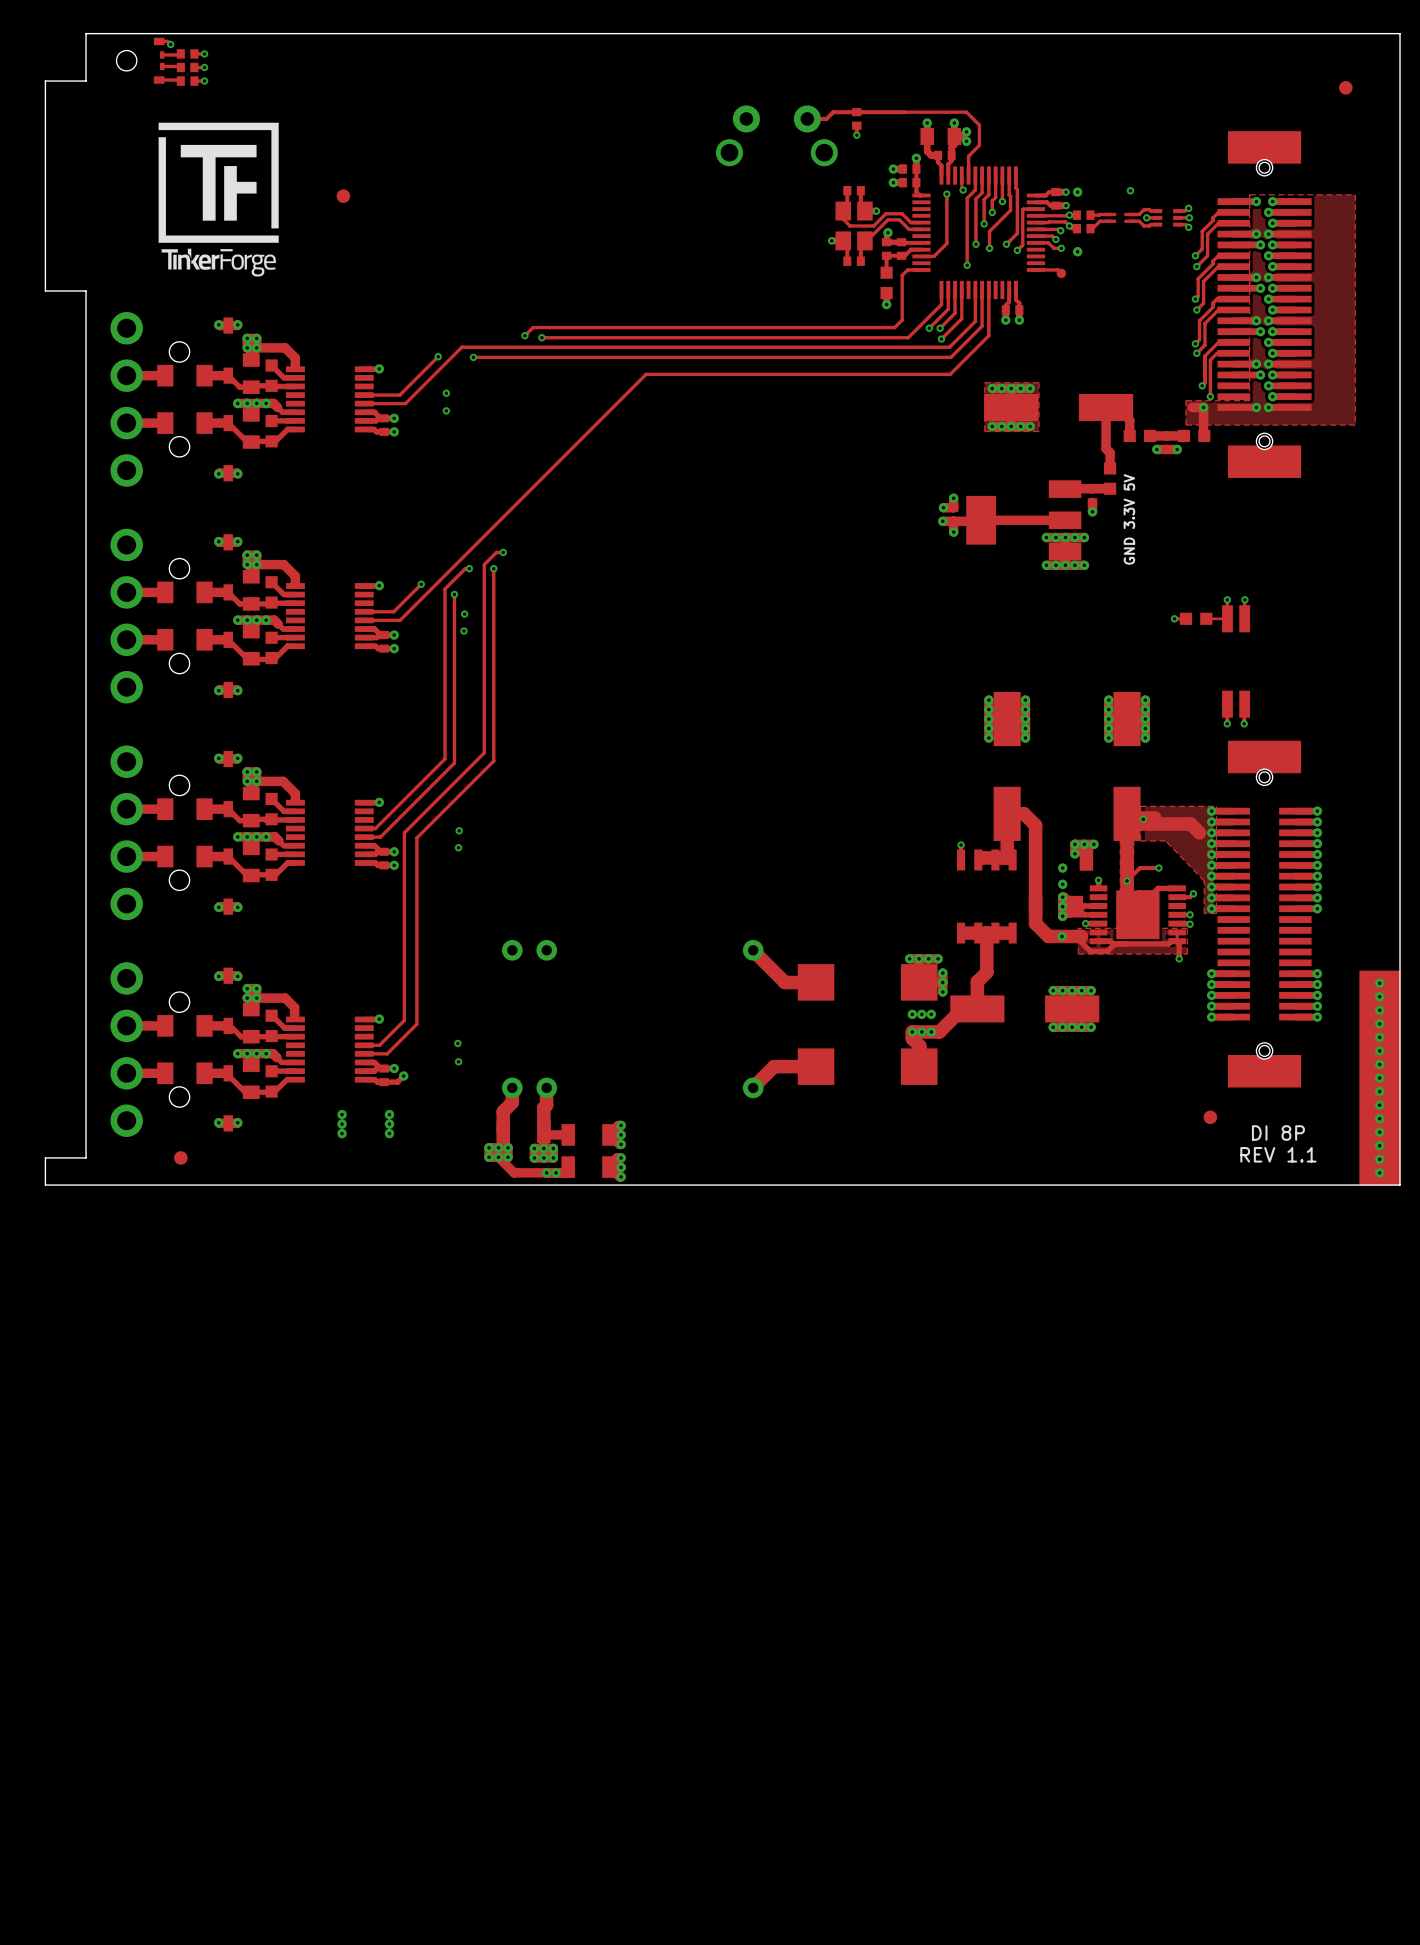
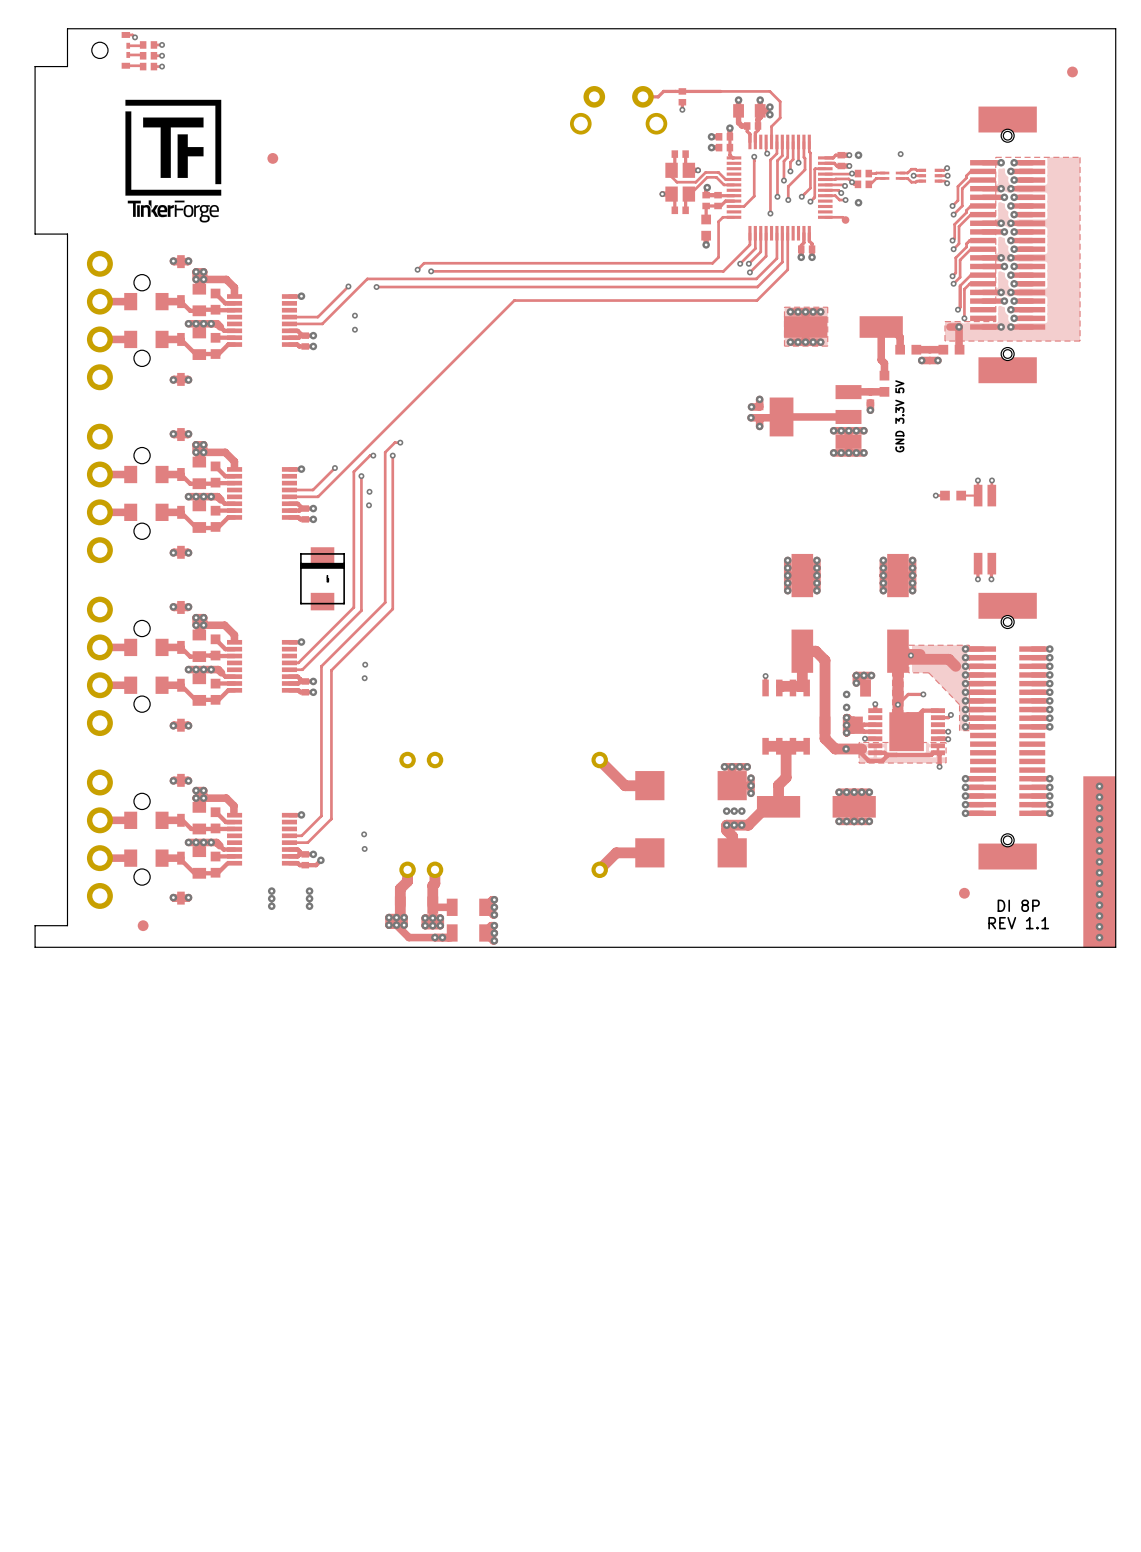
part: none -> (322, 578)

